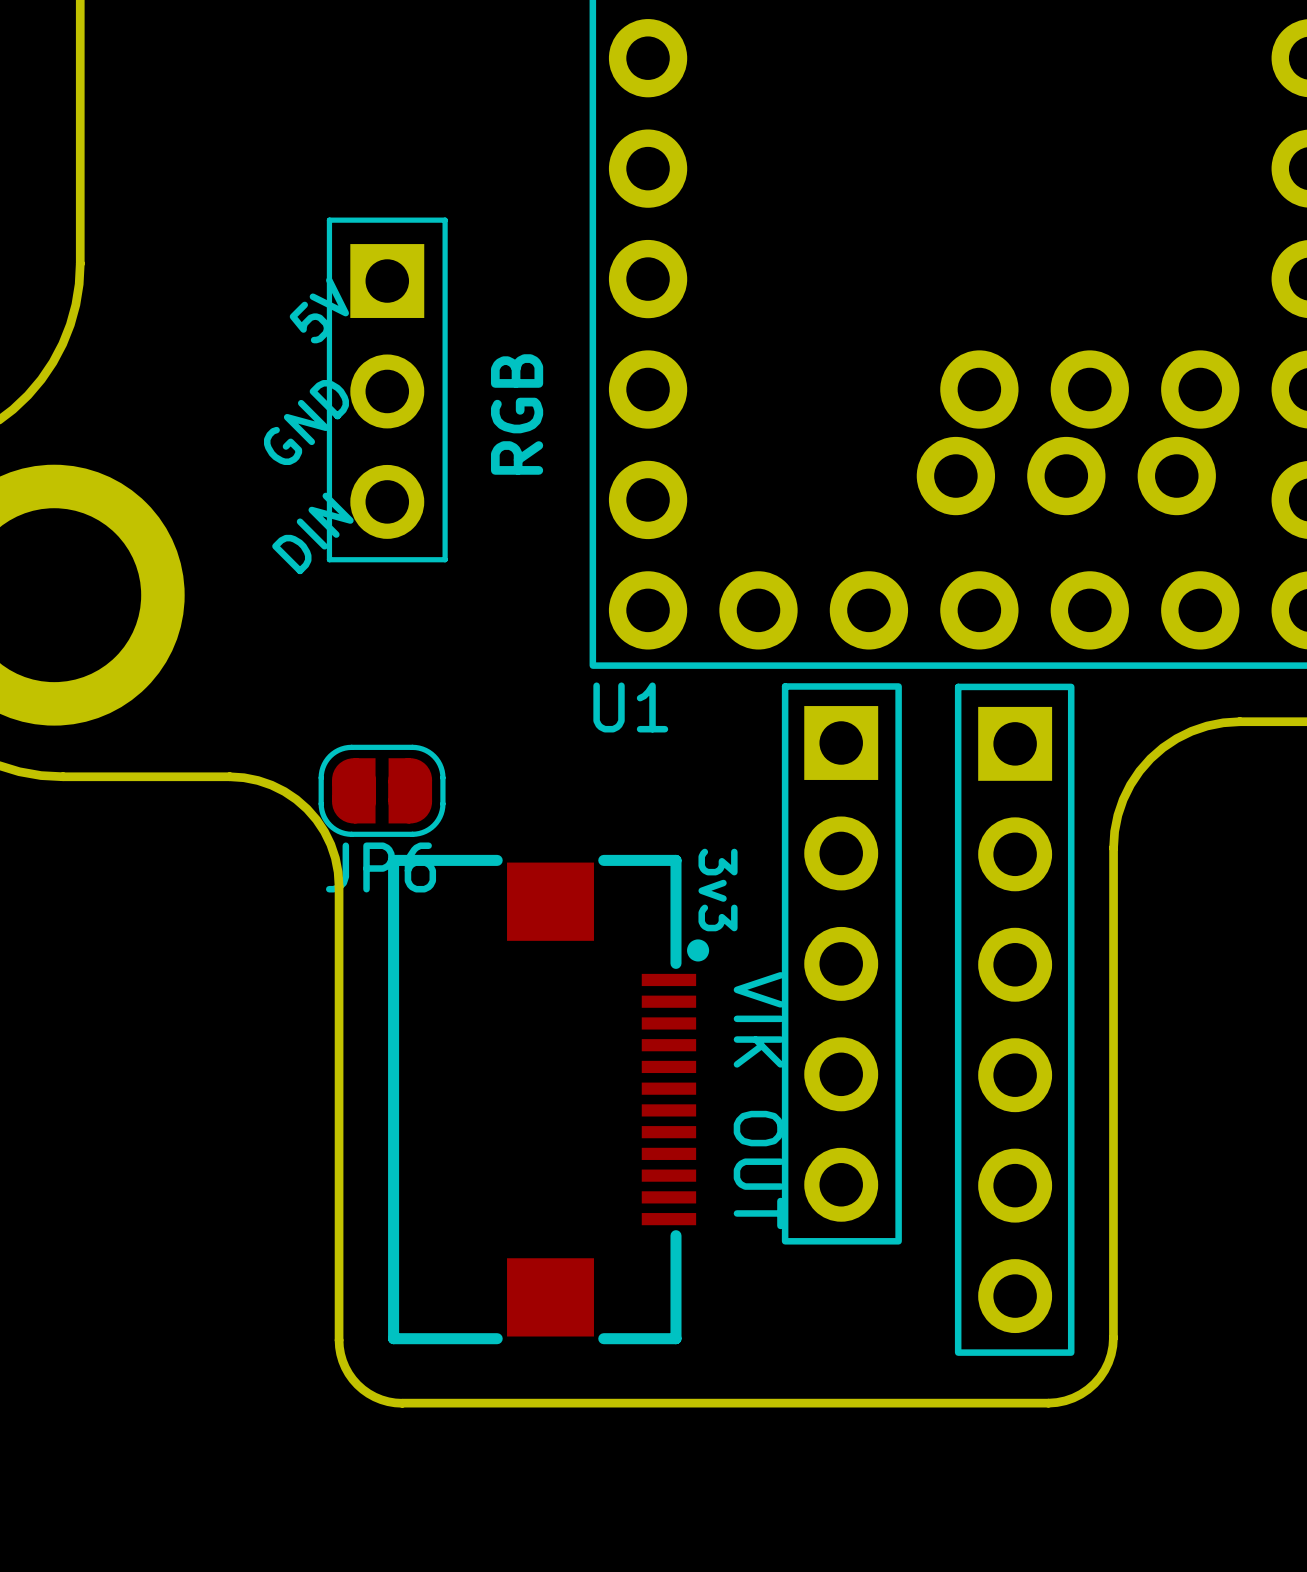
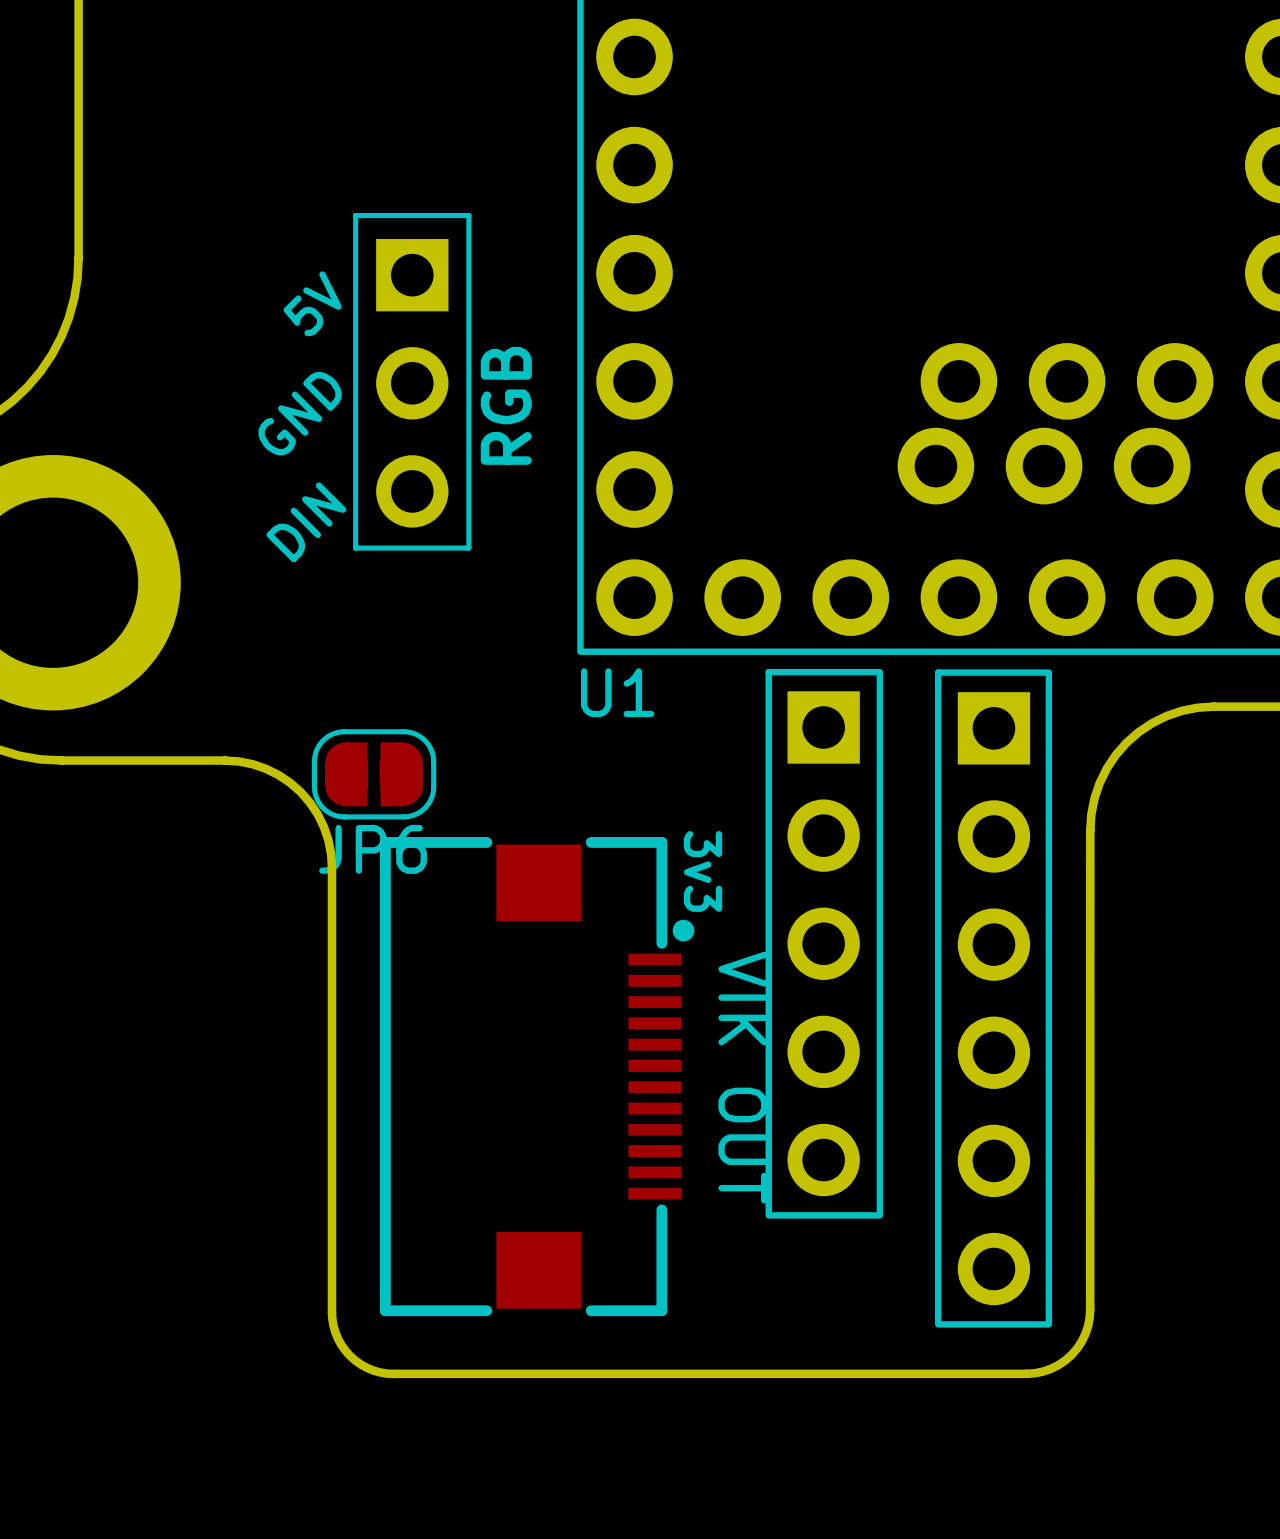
part position: (387, 389) -> (412, 381)

